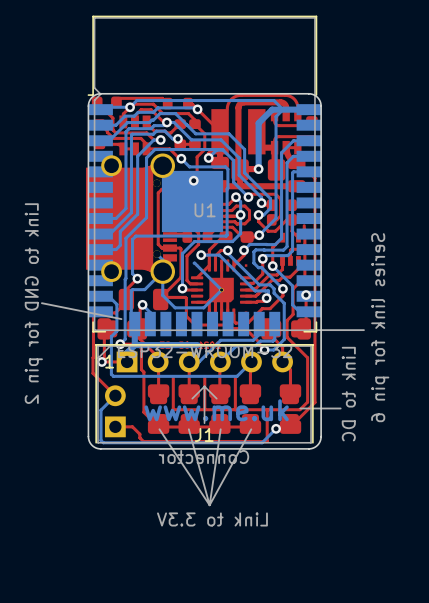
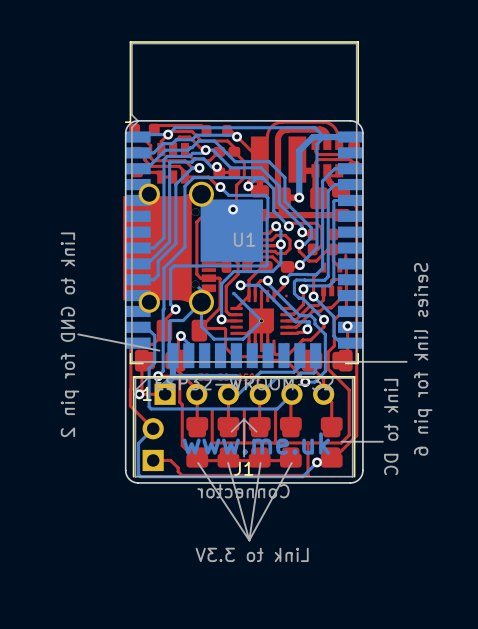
part footprint: [211, 93, 318, 193] -> [250, 120, 361, 222]

